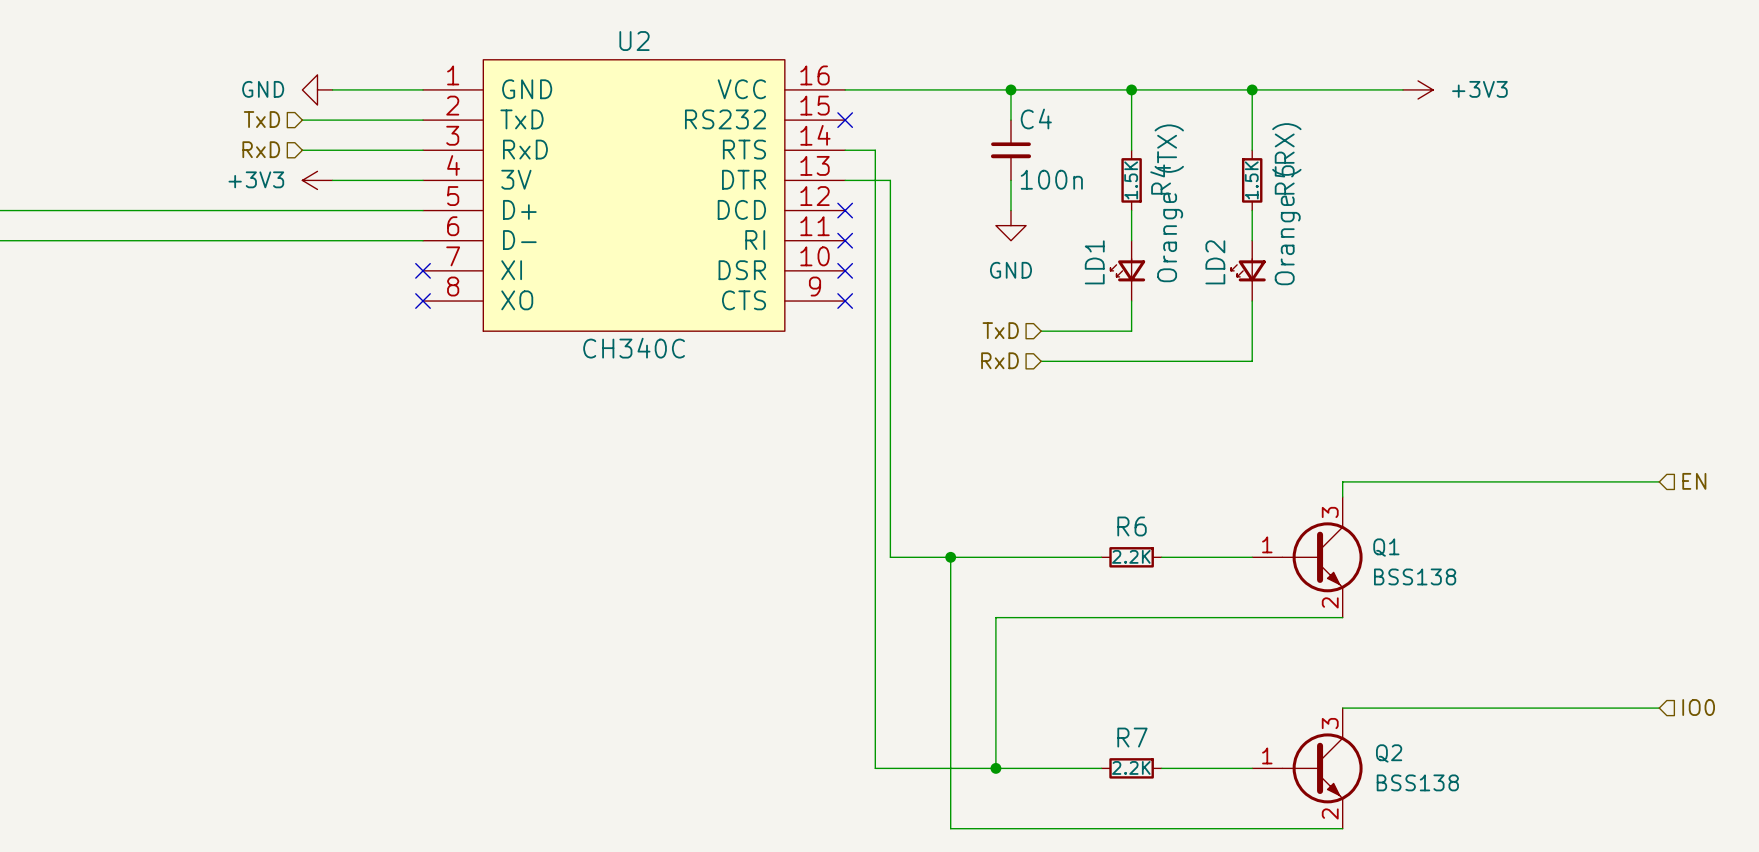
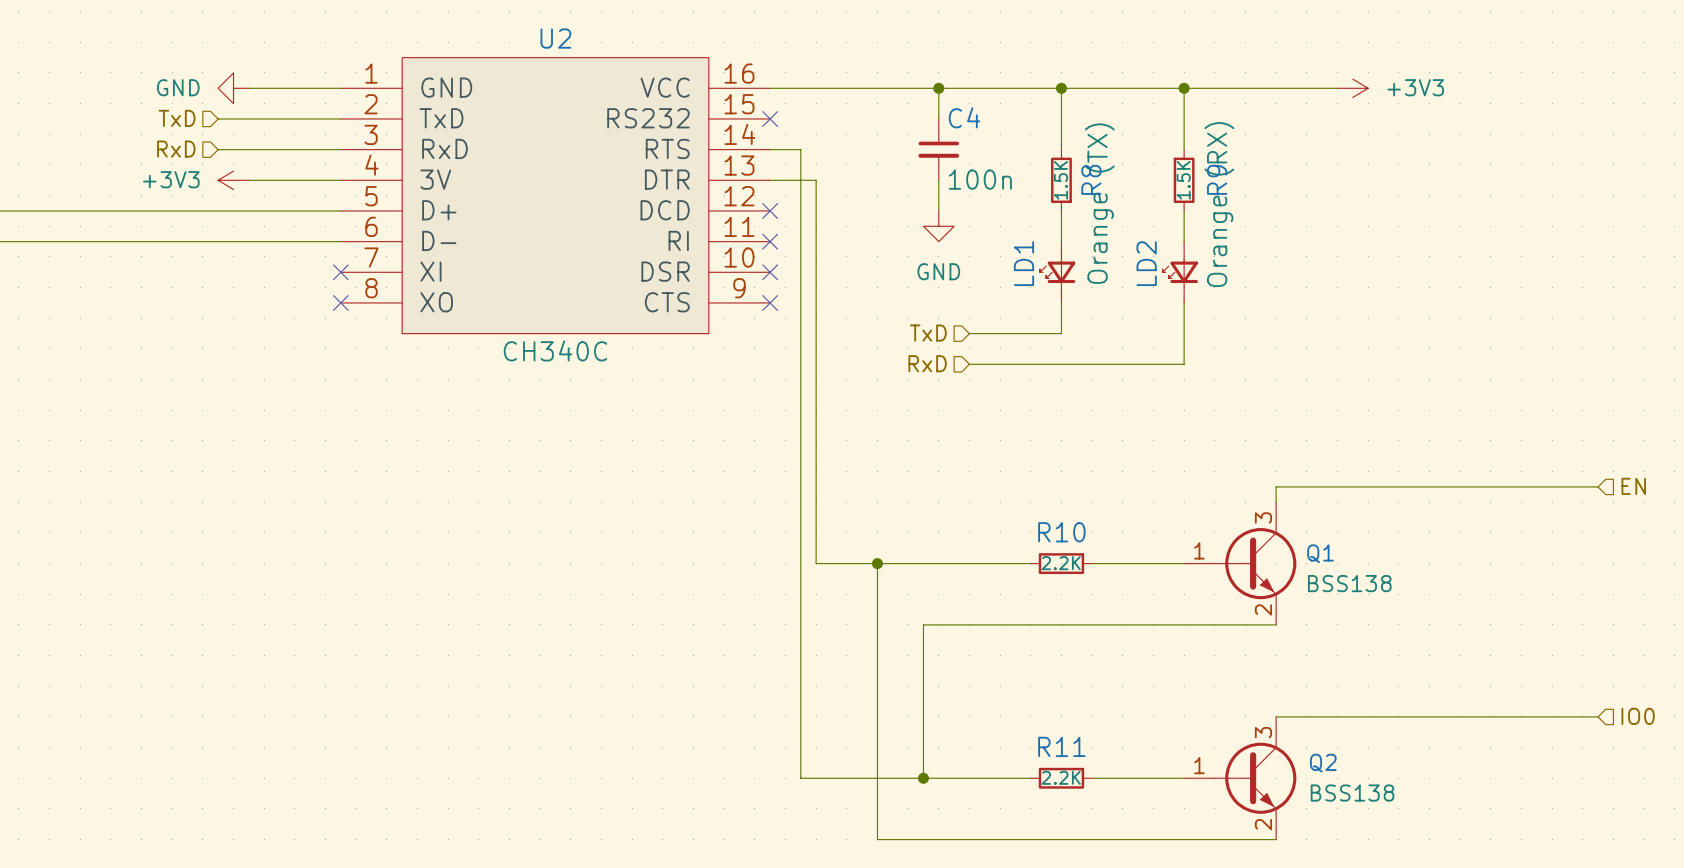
R4 name: R4 (1160, 179) -> R8 (1091, 179)
R5 name: R5 (1284, 179) -> R9 (1217, 179)
R6 name: R6 (1132, 526) -> R10 (1061, 532)
R7 name: R7 (1132, 737) -> R11 (1061, 746)

